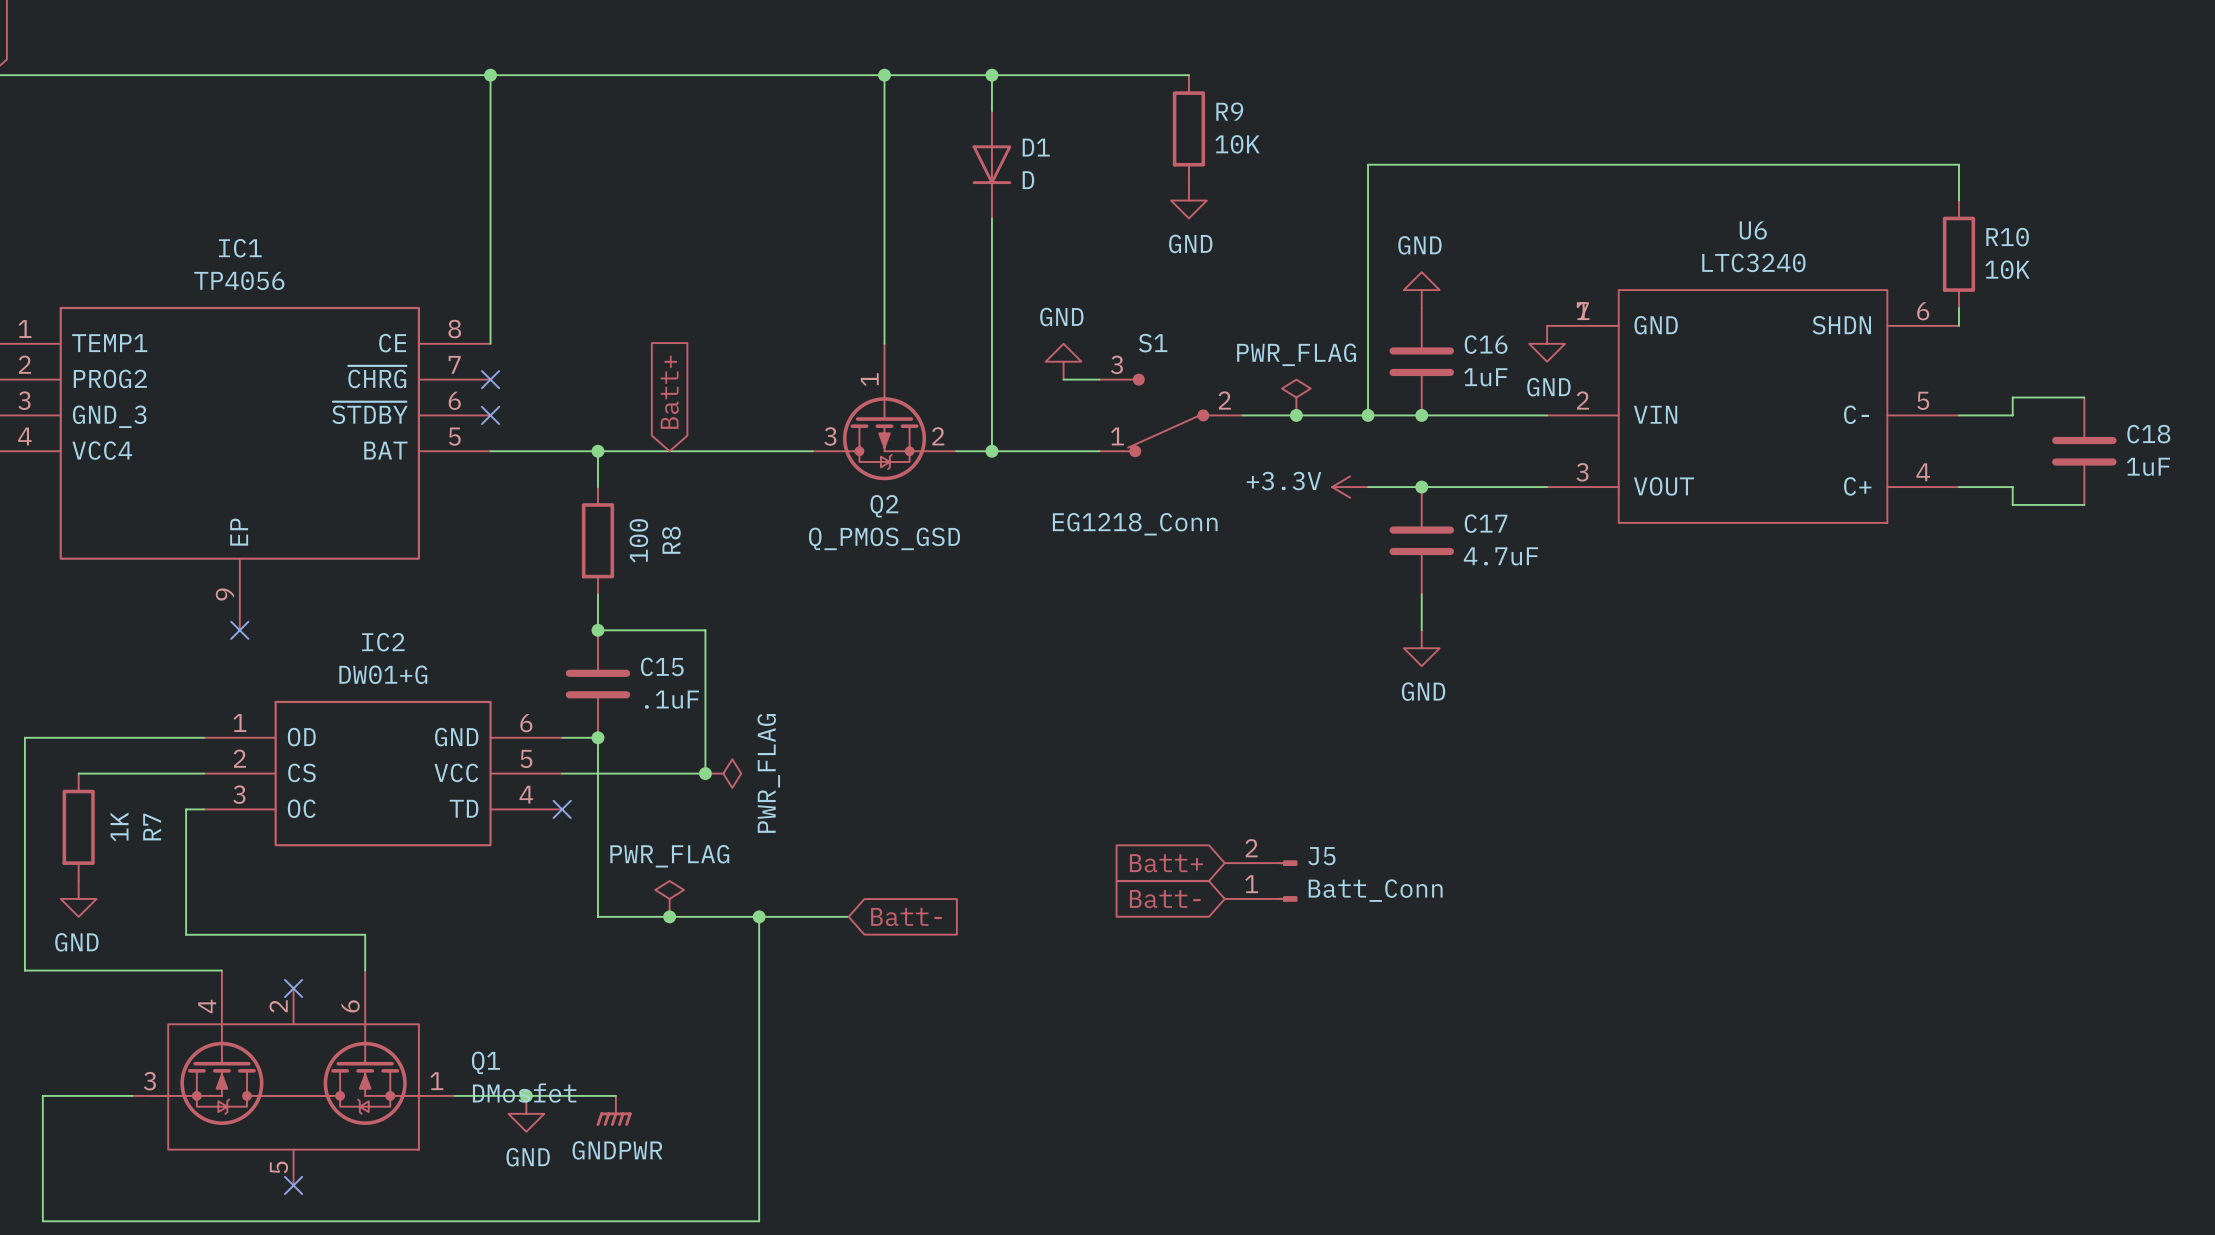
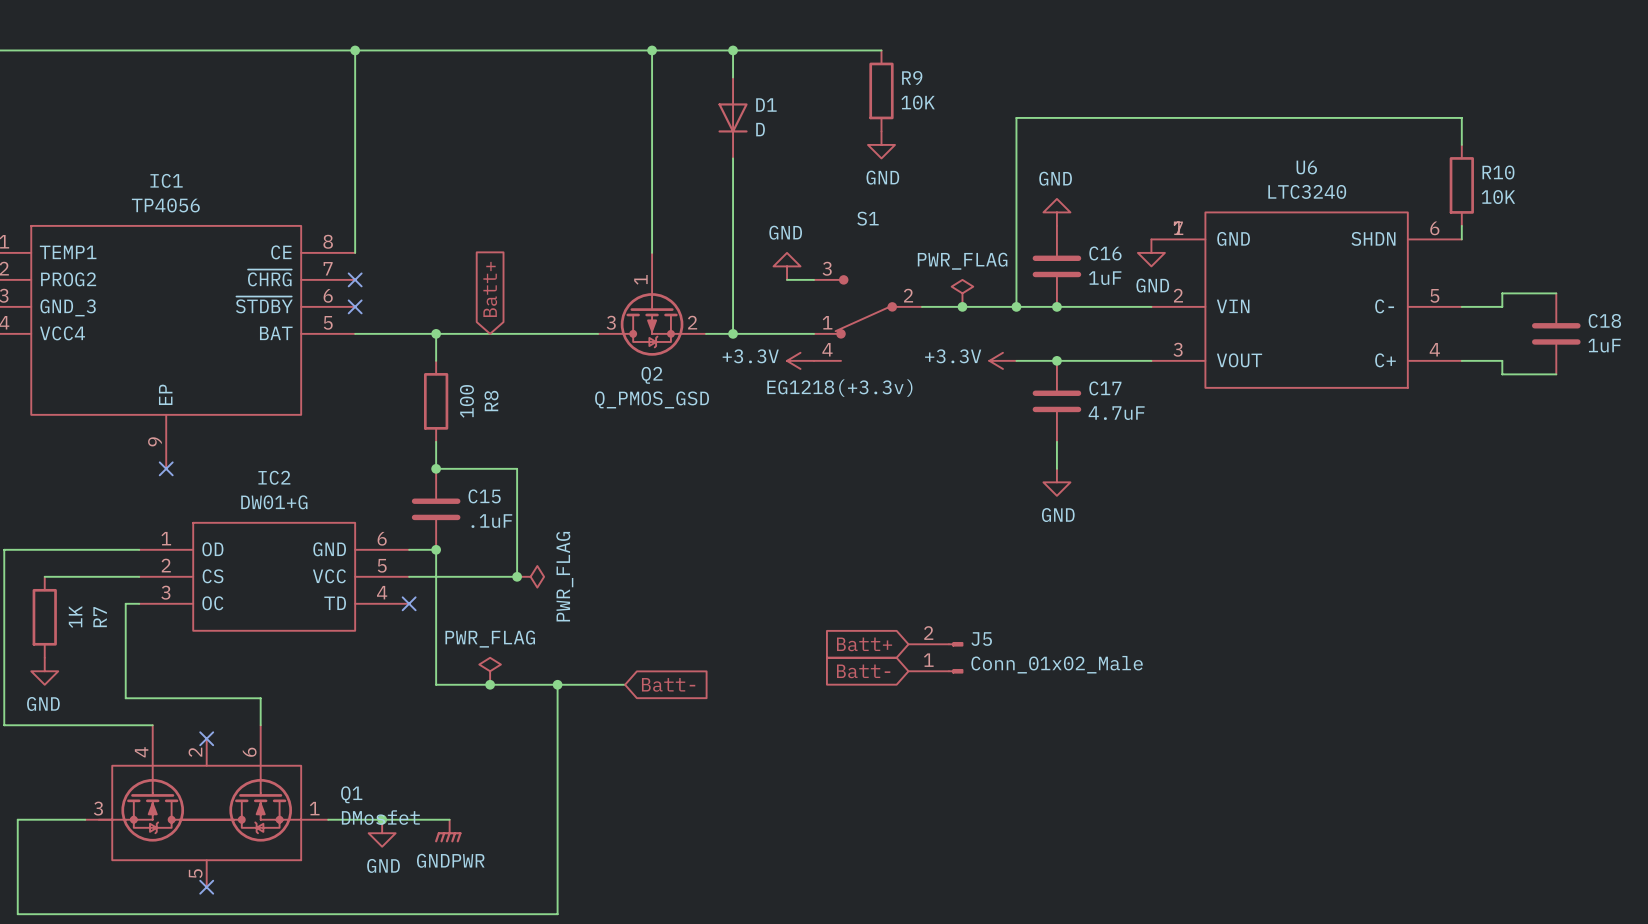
S1 name position: S1 (1153, 343) -> S1 (867, 218)
S1 symbol: [1099, 374, 1243, 457] -> [814, 276, 922, 361]
power symbol: none -> +3.3V (800, 360)
S1 value: EG1218_Conn (1135, 524) -> EG1218(+3.3v) (839, 388)
J5 value: Batt_Conn (1375, 890) -> Conn_01x02_Male (1057, 664)

